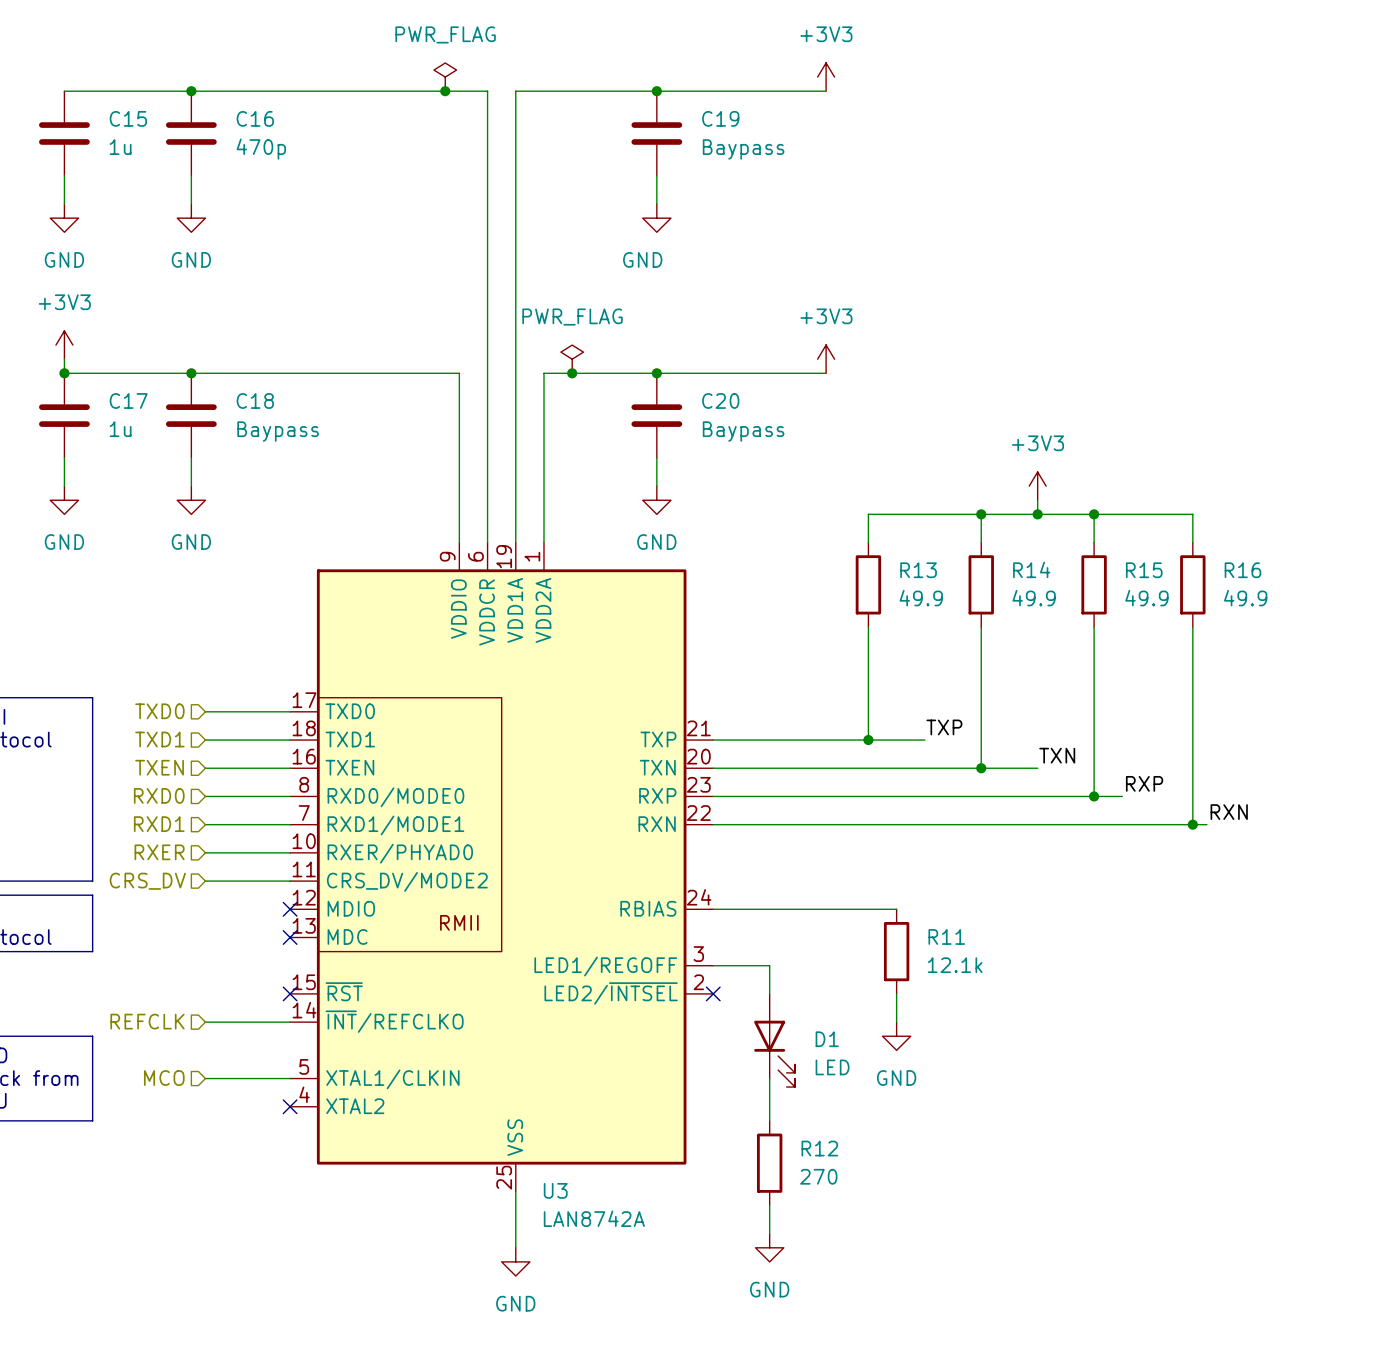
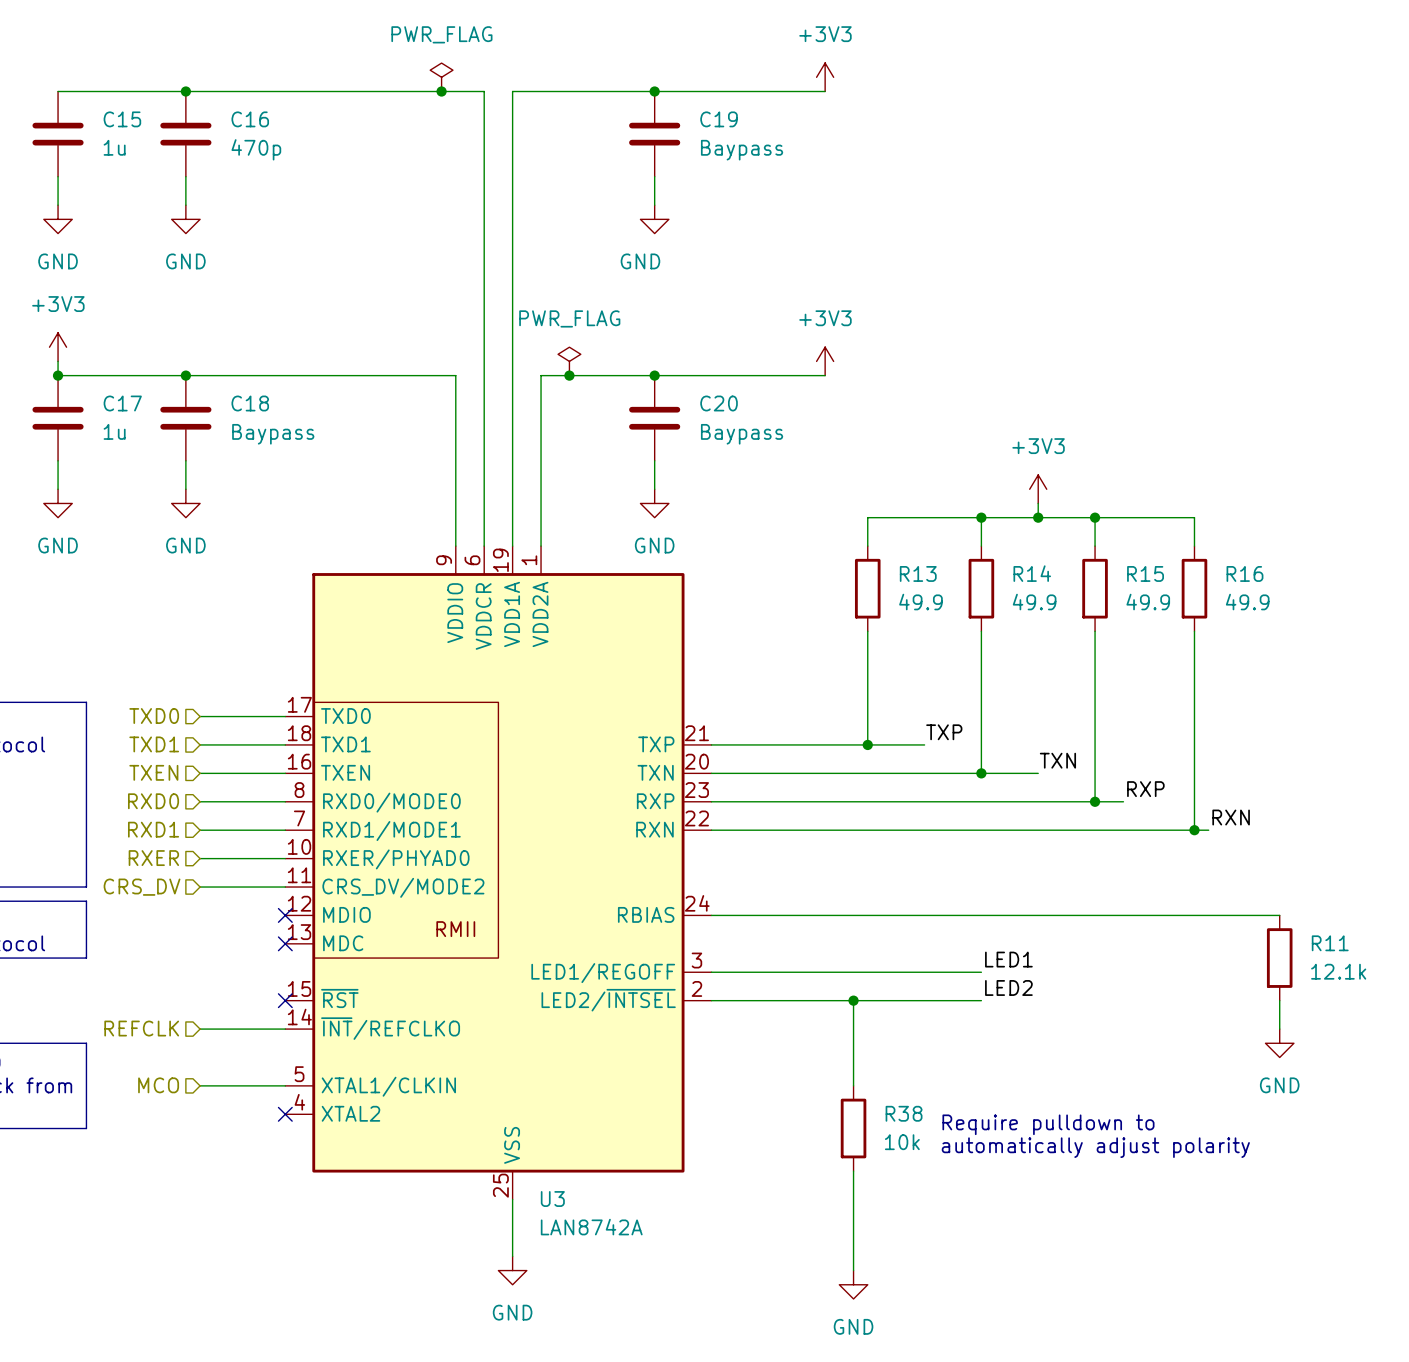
wire: none -> (896, 915) (1279, 915)
R11 position: (896, 951) -> (1279, 958)
label: none -> LED1 (1008, 959)
wire: (769, 965) (769, 993) -> (768, 972) (981, 972)
label: none -> LED2 (1008, 987)
wire: none -> (711, 1000) (981, 1000)
no-connect mark: (713, 993) -> none
wire: none -> (853, 1000) (853, 1085)
junction: none -> (853, 1000)
wire: (896, 993) (896, 1022) -> none
wire: none -> (1279, 1000) (1279, 1029)
power symbol: GND (896, 1036) -> none
power symbol: none -> GND (1279, 1043)
D1: LED (774, 1040) -> none
wire: (769, 1078) (769, 1120) -> none
text: none -> Require pulldown to (1048, 1124)
R38: none -> 10k (853, 1128)
text: none -> automatically adjust polarity (1095, 1147)
R12: 270 (769, 1163) -> none
wire: none -> (853, 1171) (853, 1270)
wire: (769, 1205) (769, 1233) -> none
power symbol position: GND (769, 1247) -> GND (853, 1284)

